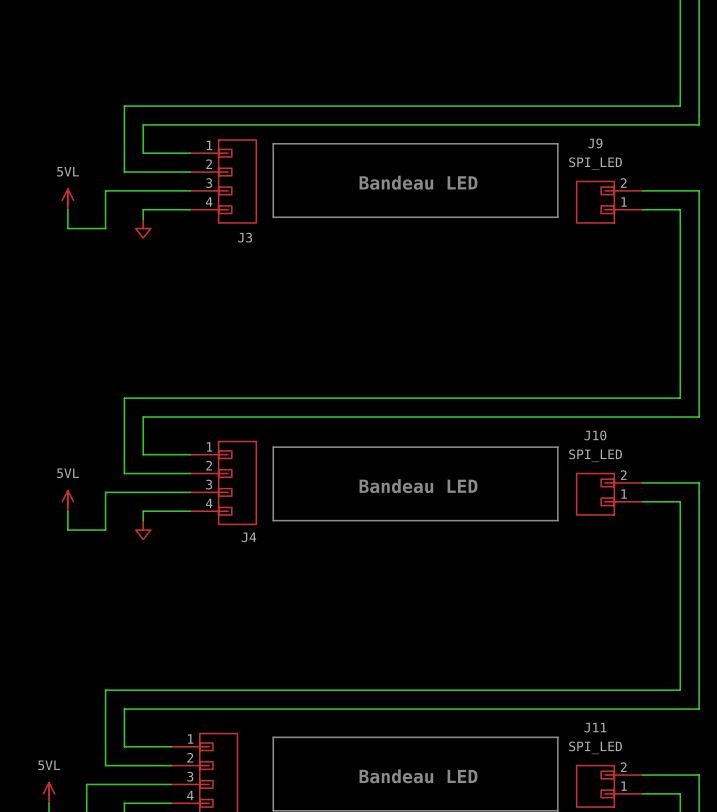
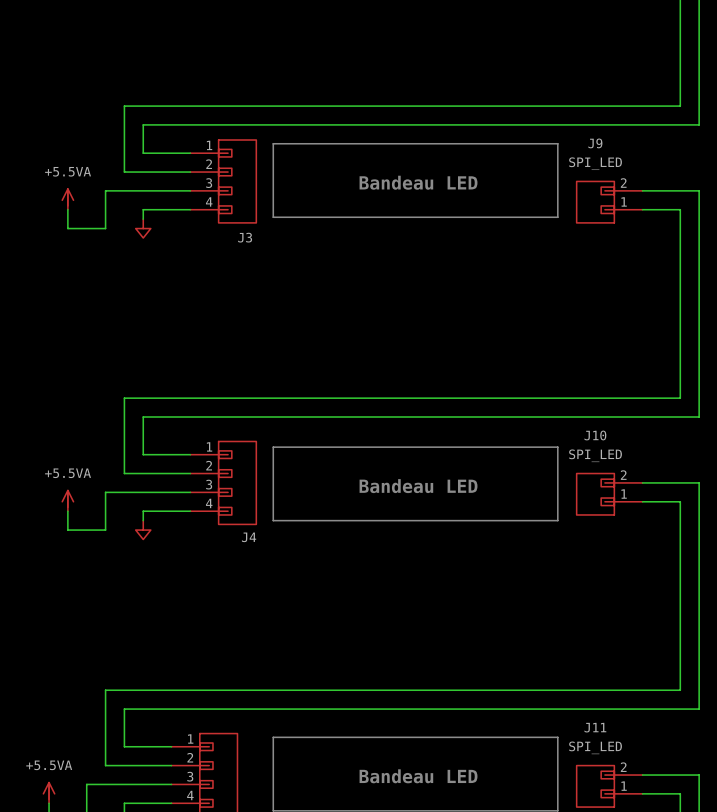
power symbol: 5VL (67, 199) -> +5.5VA (67, 199)
power symbol: 5VL (67, 500) -> +5.5VA (67, 500)
power symbol: 5VL (49, 792) -> +5.5VA (49, 792)

